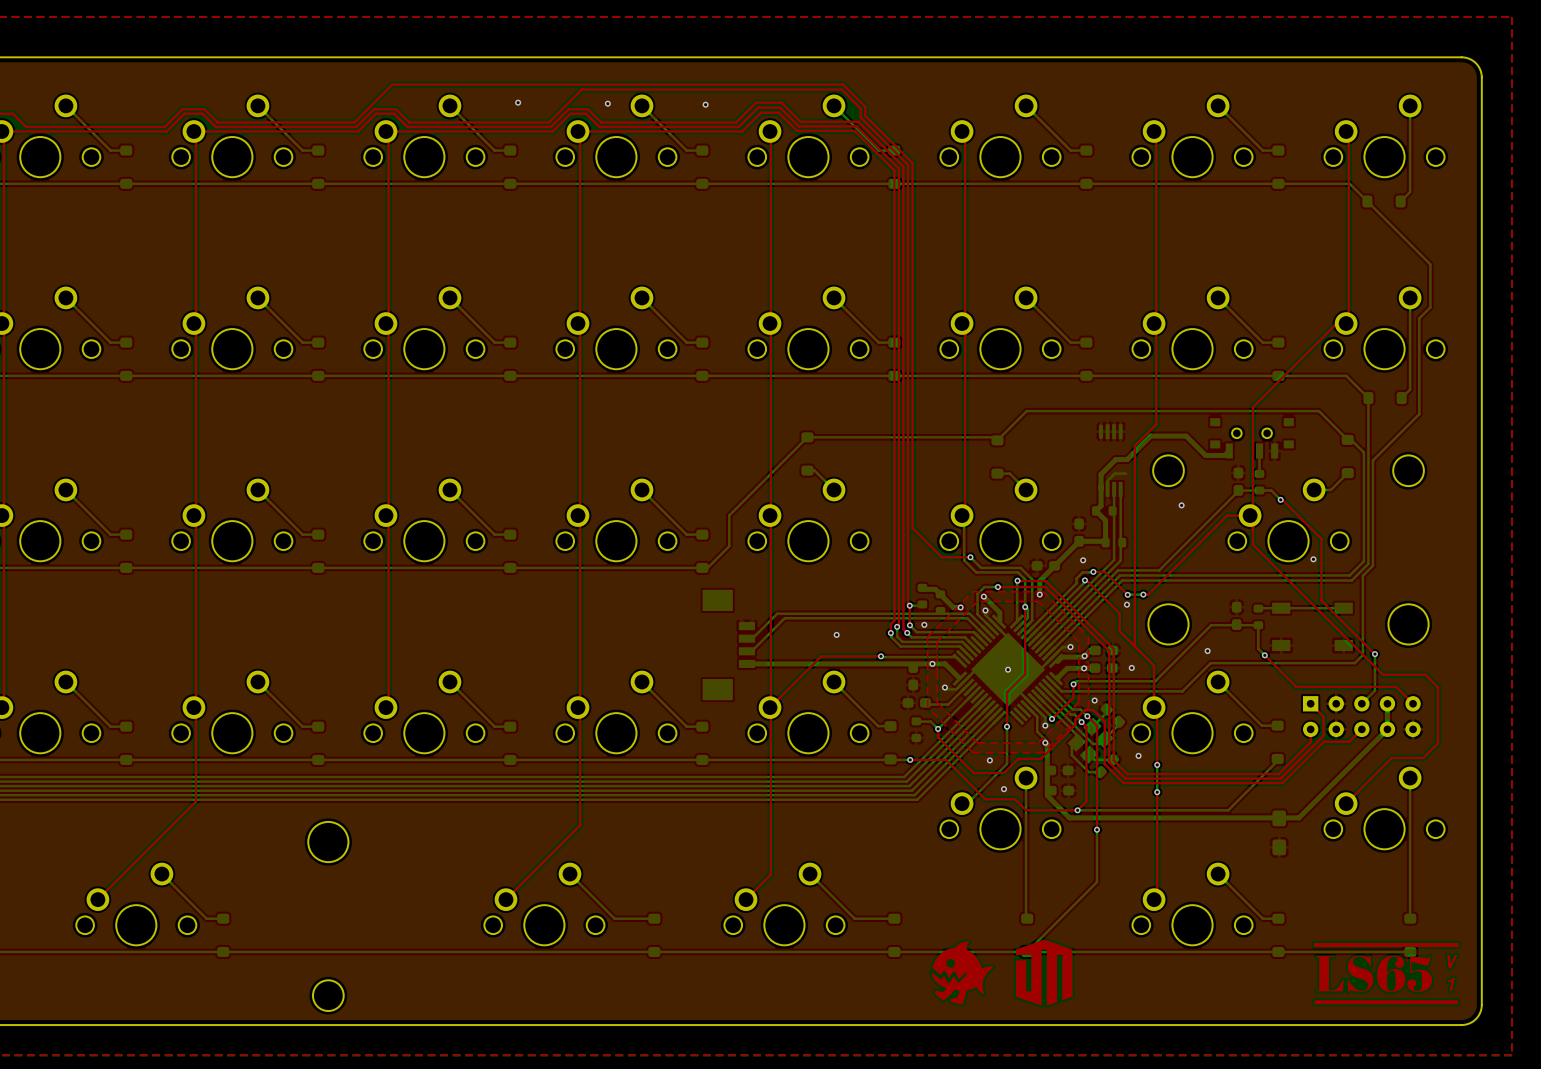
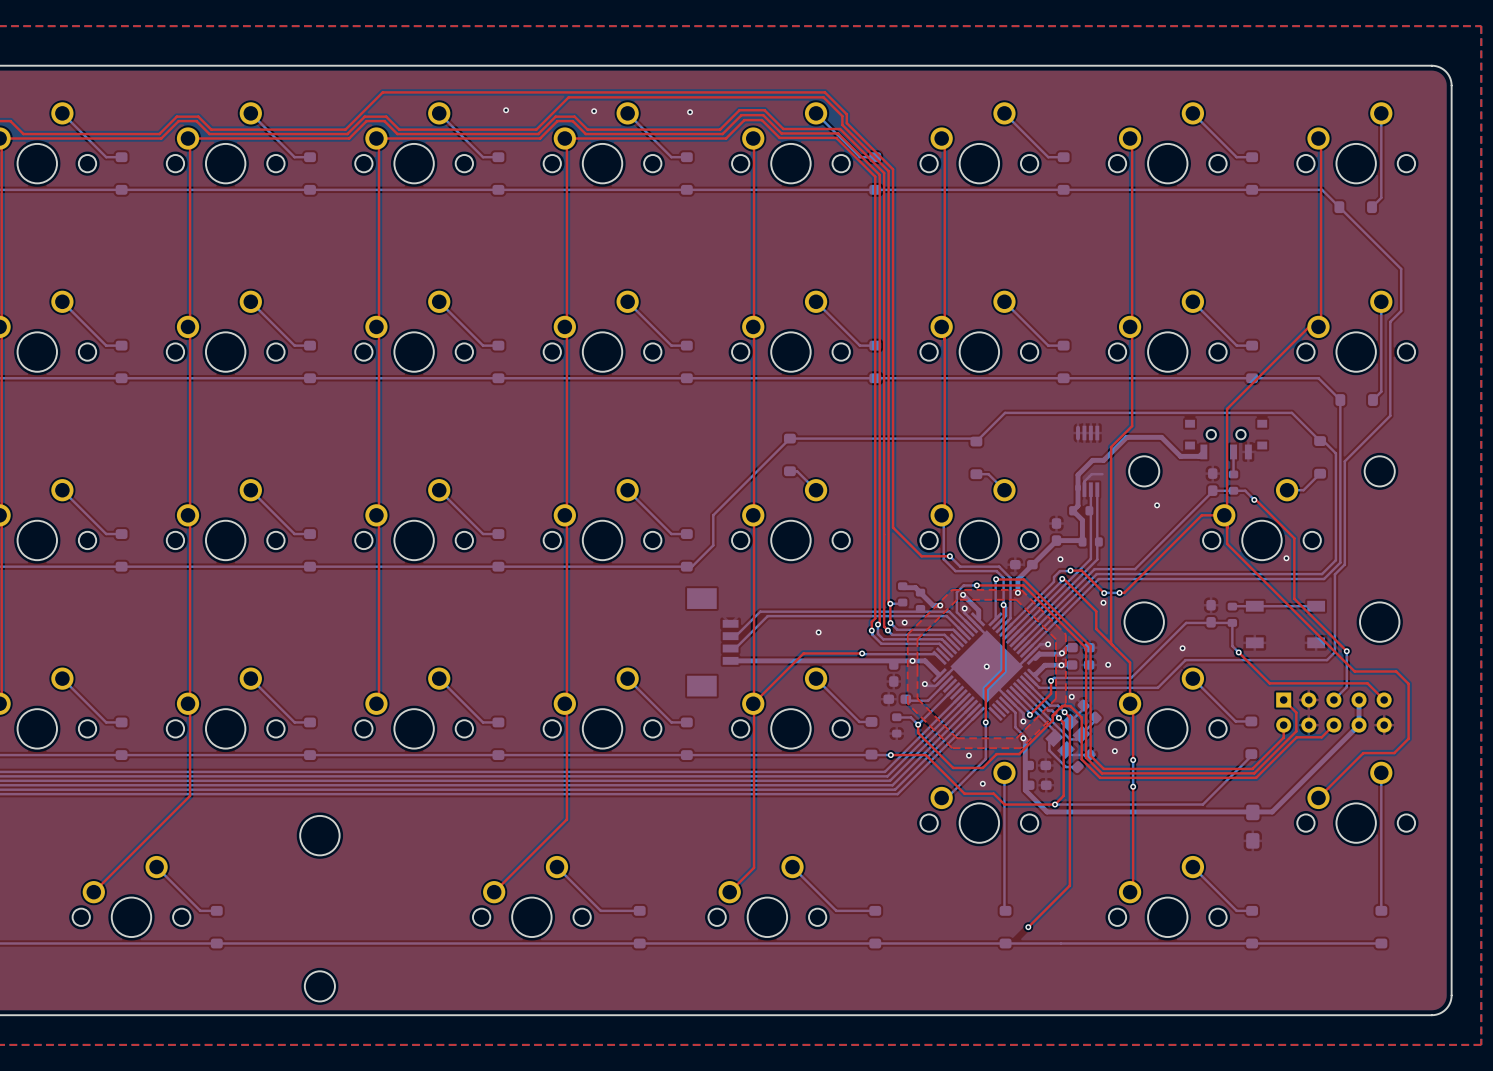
top track: (1092, 721) (1096, 725) (1096, 829) -> (1069, 717) (1069, 885) (1028, 927)
bottom track: (1096, 829) (1096, 882) (1027, 951) -> none
via: (1096, 829) -> none
via: none -> (1028, 927)
drawing: [1015, 939, 1073, 1006] -> none
drawing: [931, 941, 994, 1005] -> none
drawing: [1313, 942, 1459, 1005] -> none

